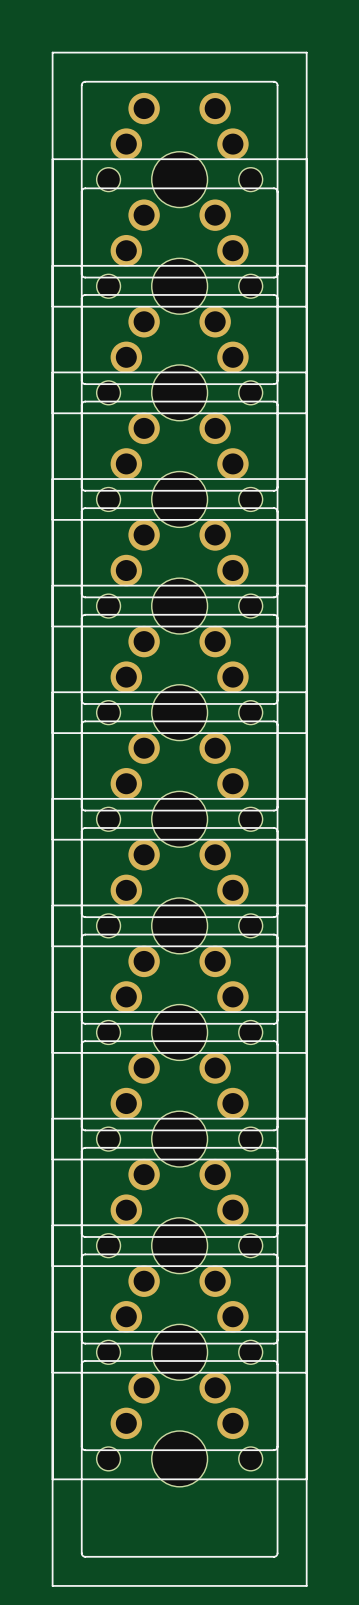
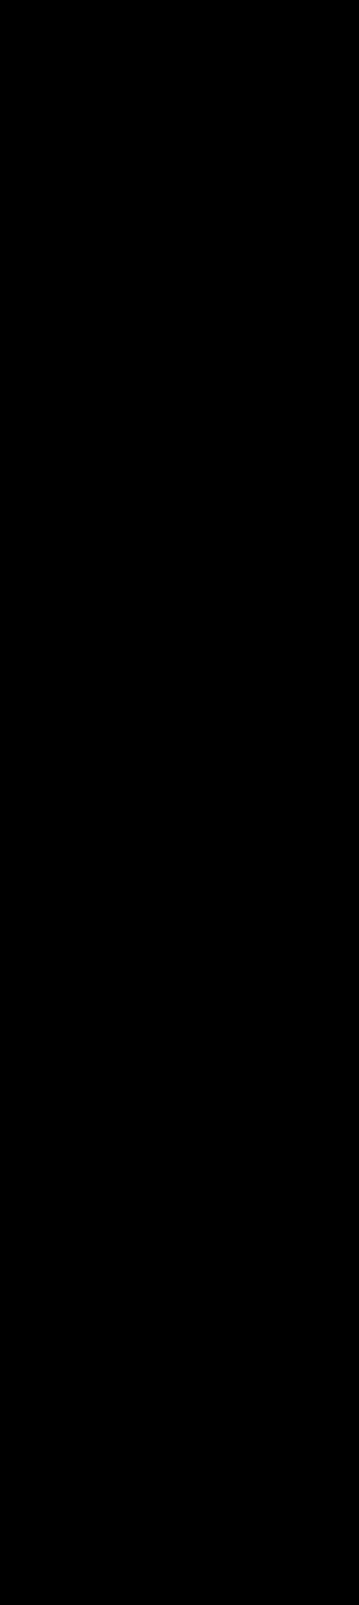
part: (179, 179) -> none
part: (179, 286) -> none
part: (179, 392) -> none
part: (179, 499) -> none
part: (179, 606) -> none
part: (179, 712) -> none
part: (179, 819) -> none
part: (179, 925) -> none
part: (179, 1032) -> none
part: (179, 1139) -> none
part: (179, 1245) -> none
part: (179, 1352) -> none
part: (179, 1458) -> none

